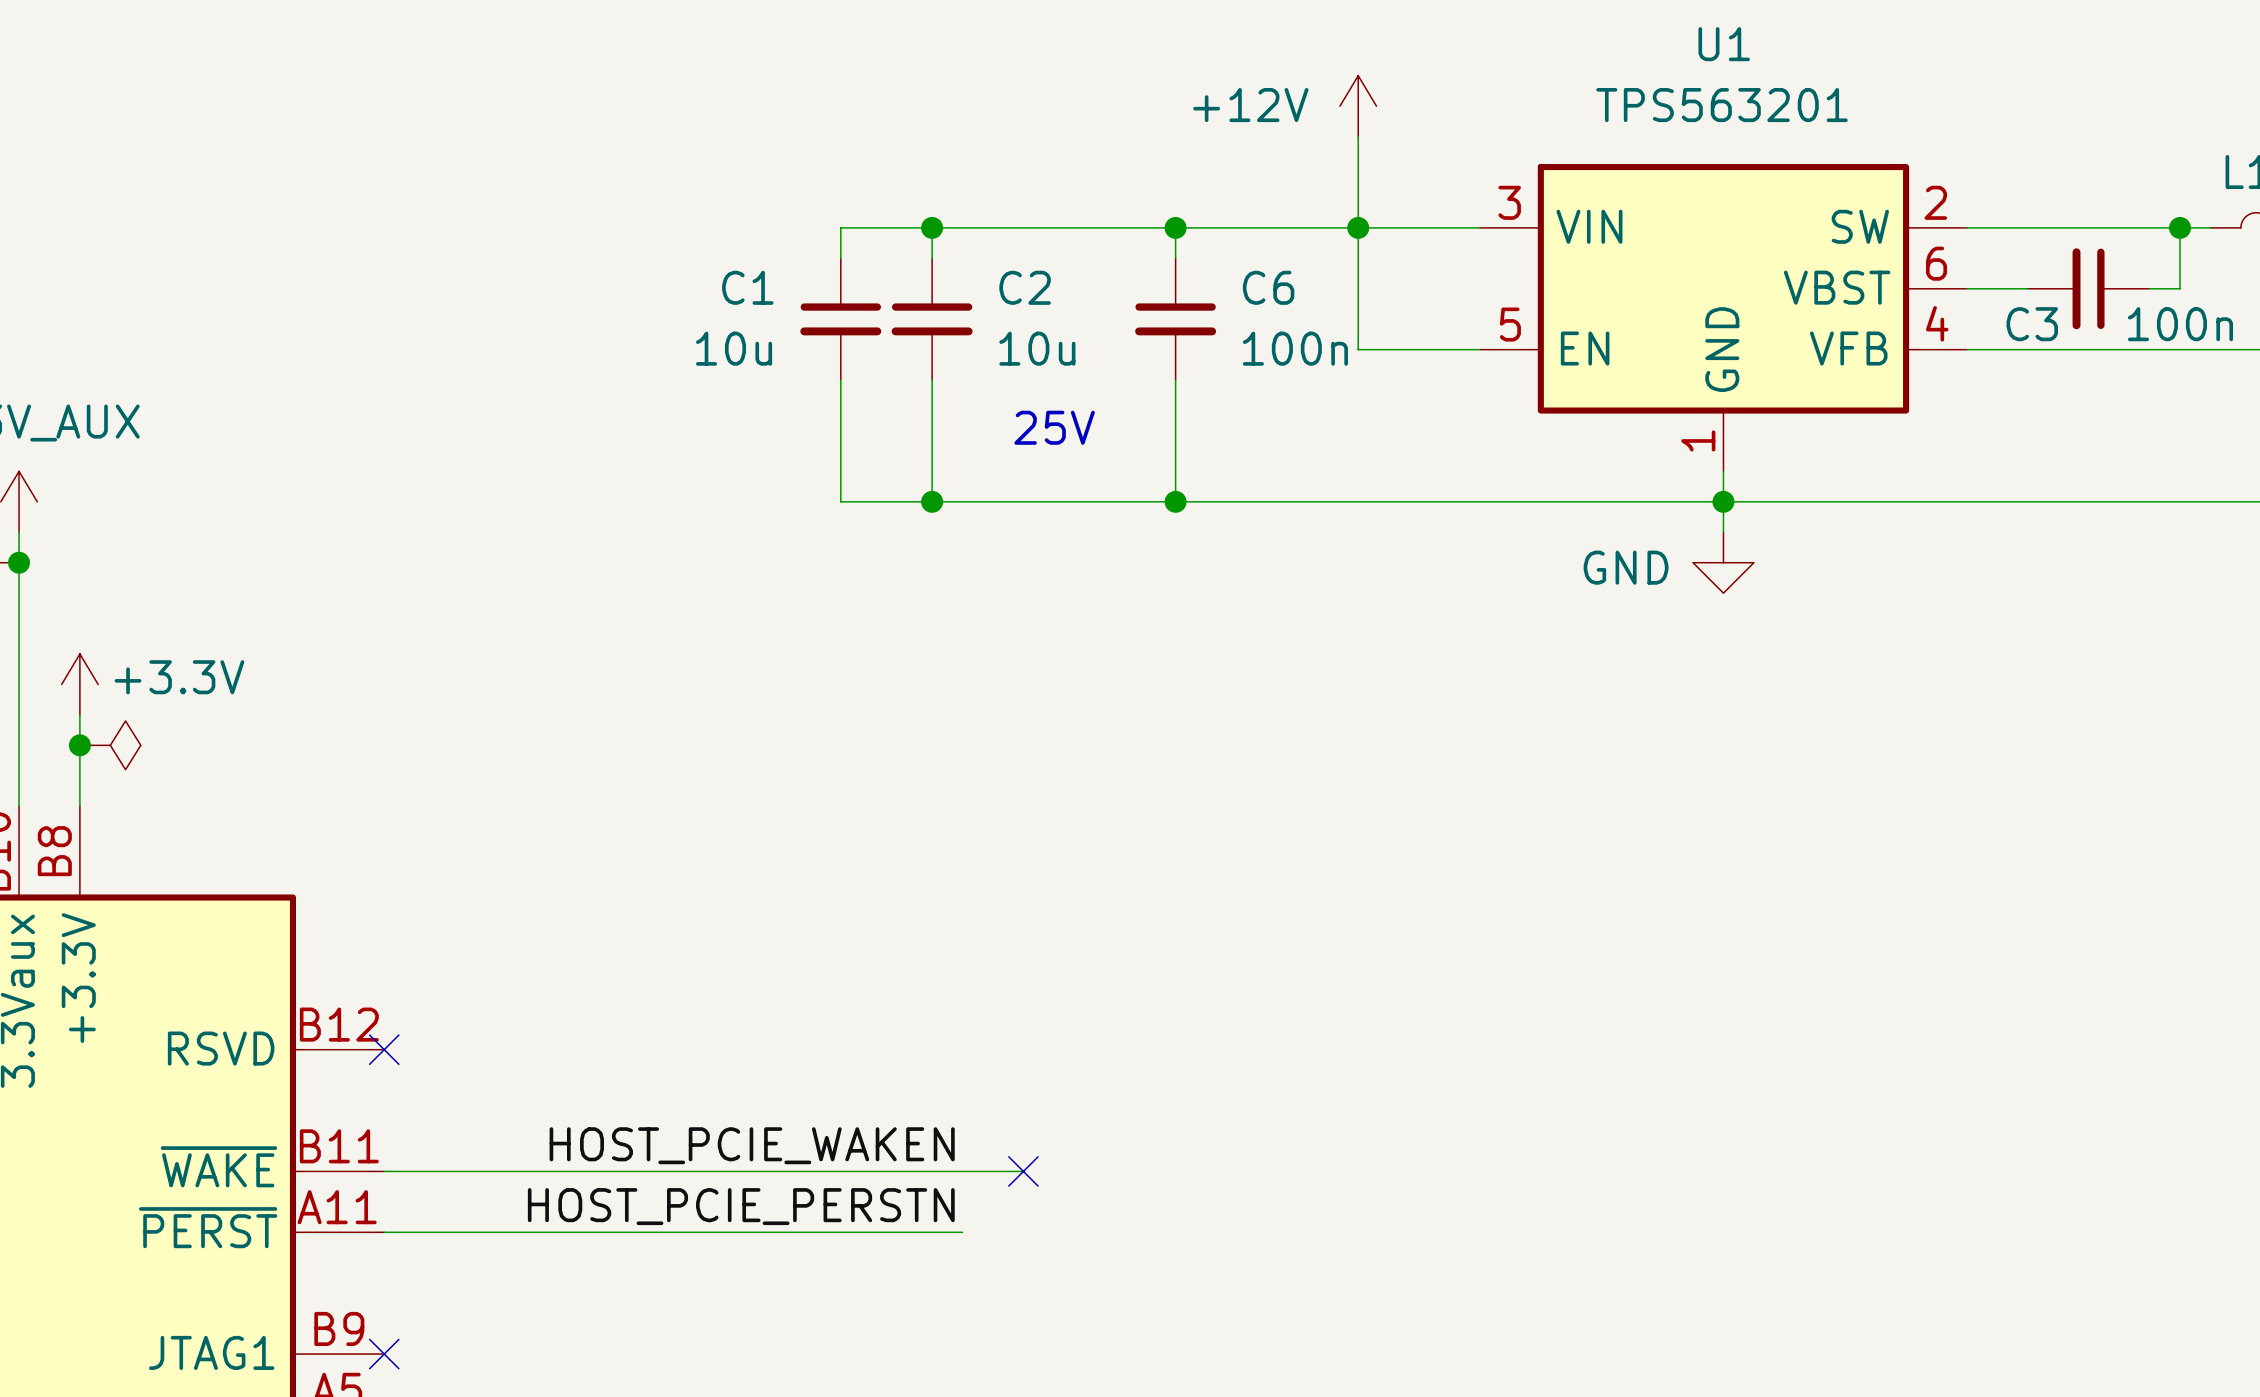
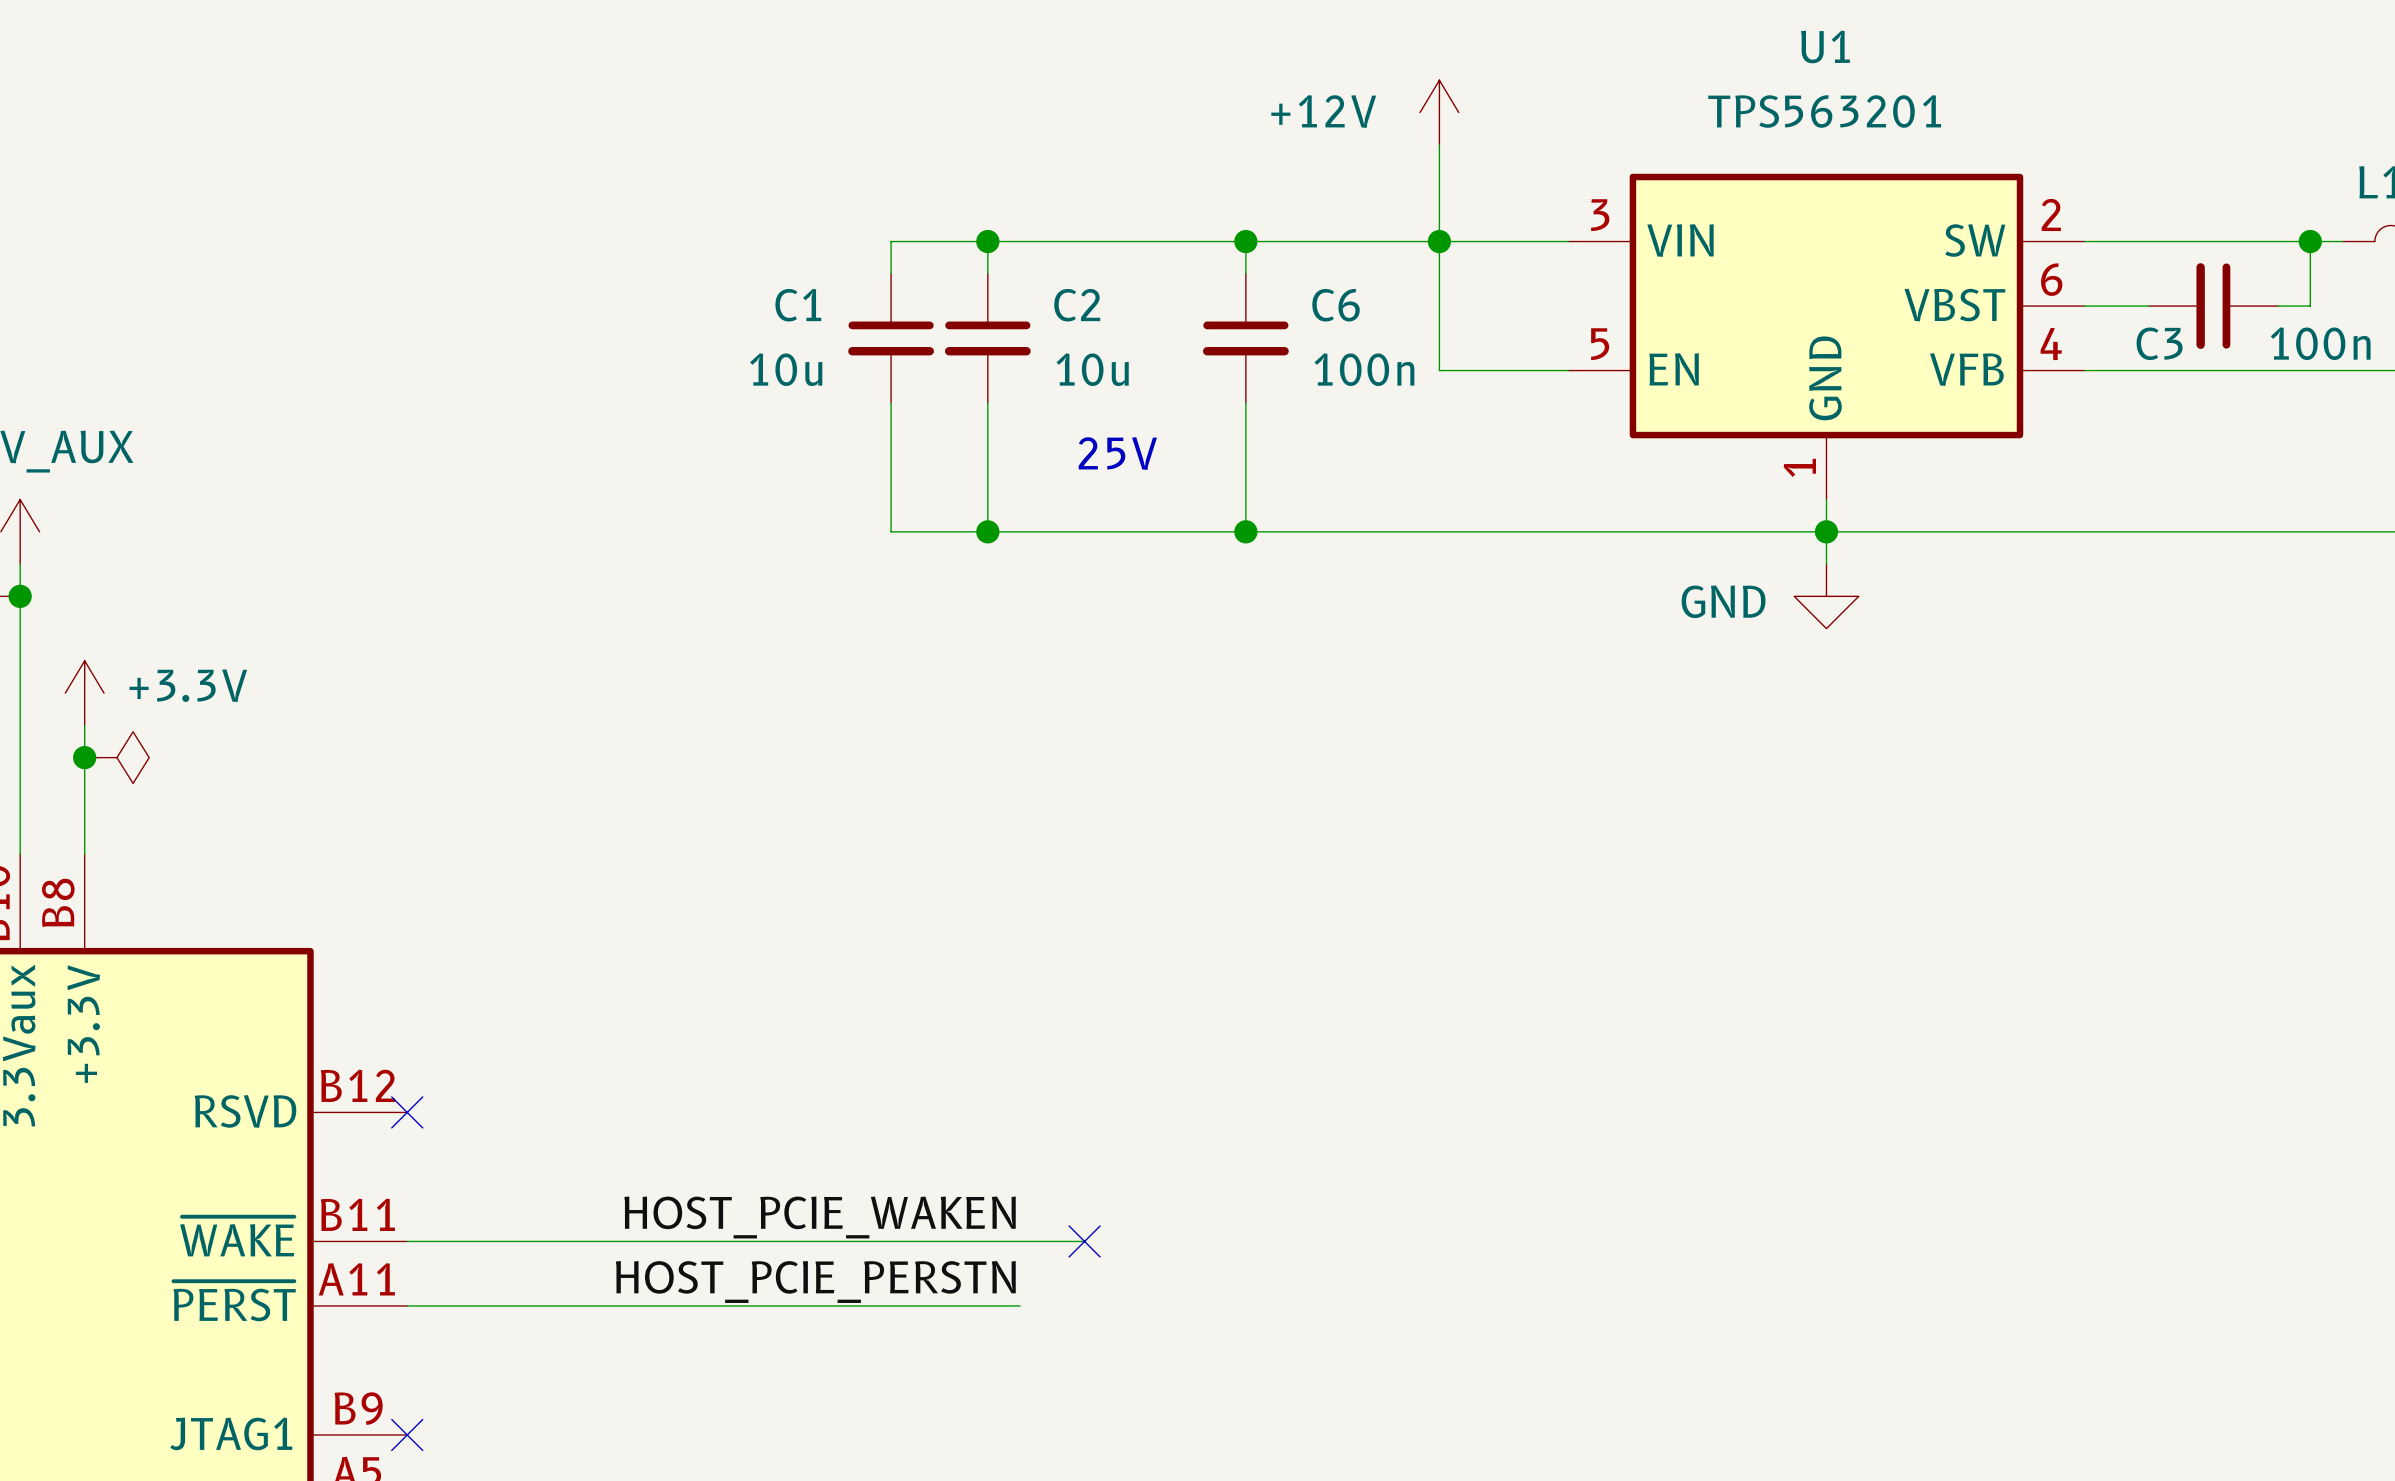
power symbol position: +3.3V (79, 684) -> +3.3V (84, 693)
junction position: (79, 745) -> (84, 757)
power symbol position: (110, 745) -> (116, 757)

